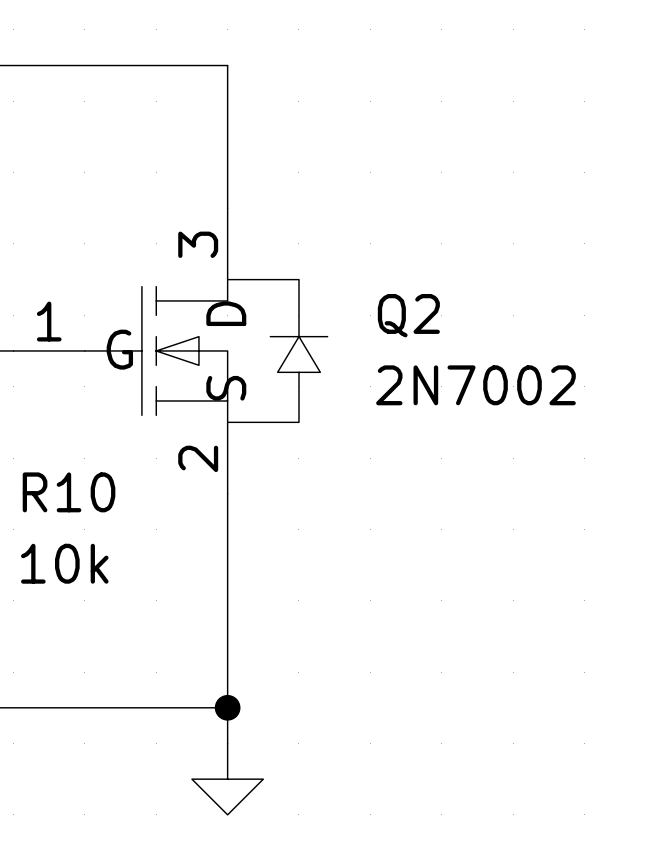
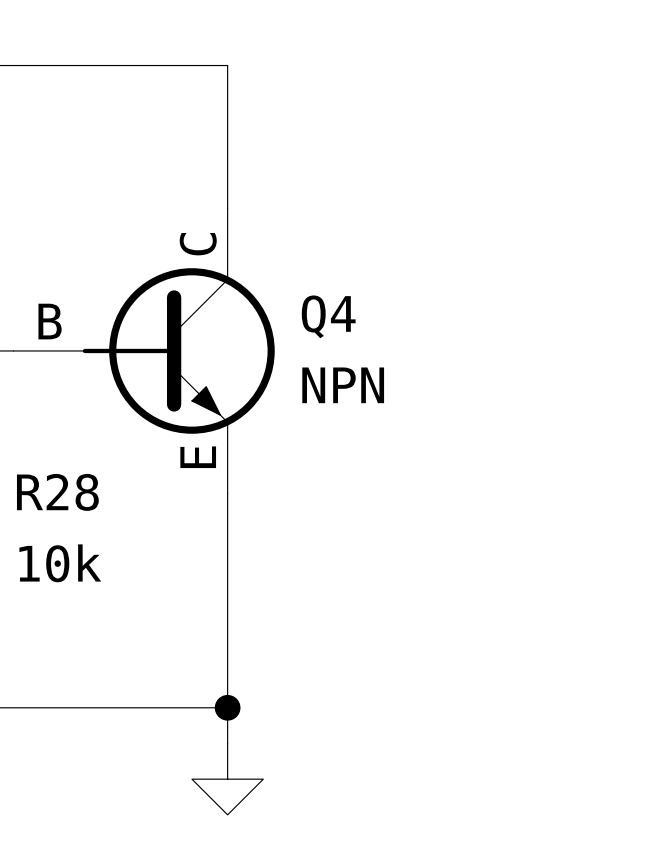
Q4: none -> NPN (144, 350)
Q2: 2N7002 (170, 350) -> none
R10 name: R10 (69, 492) -> R28 (57, 492)

